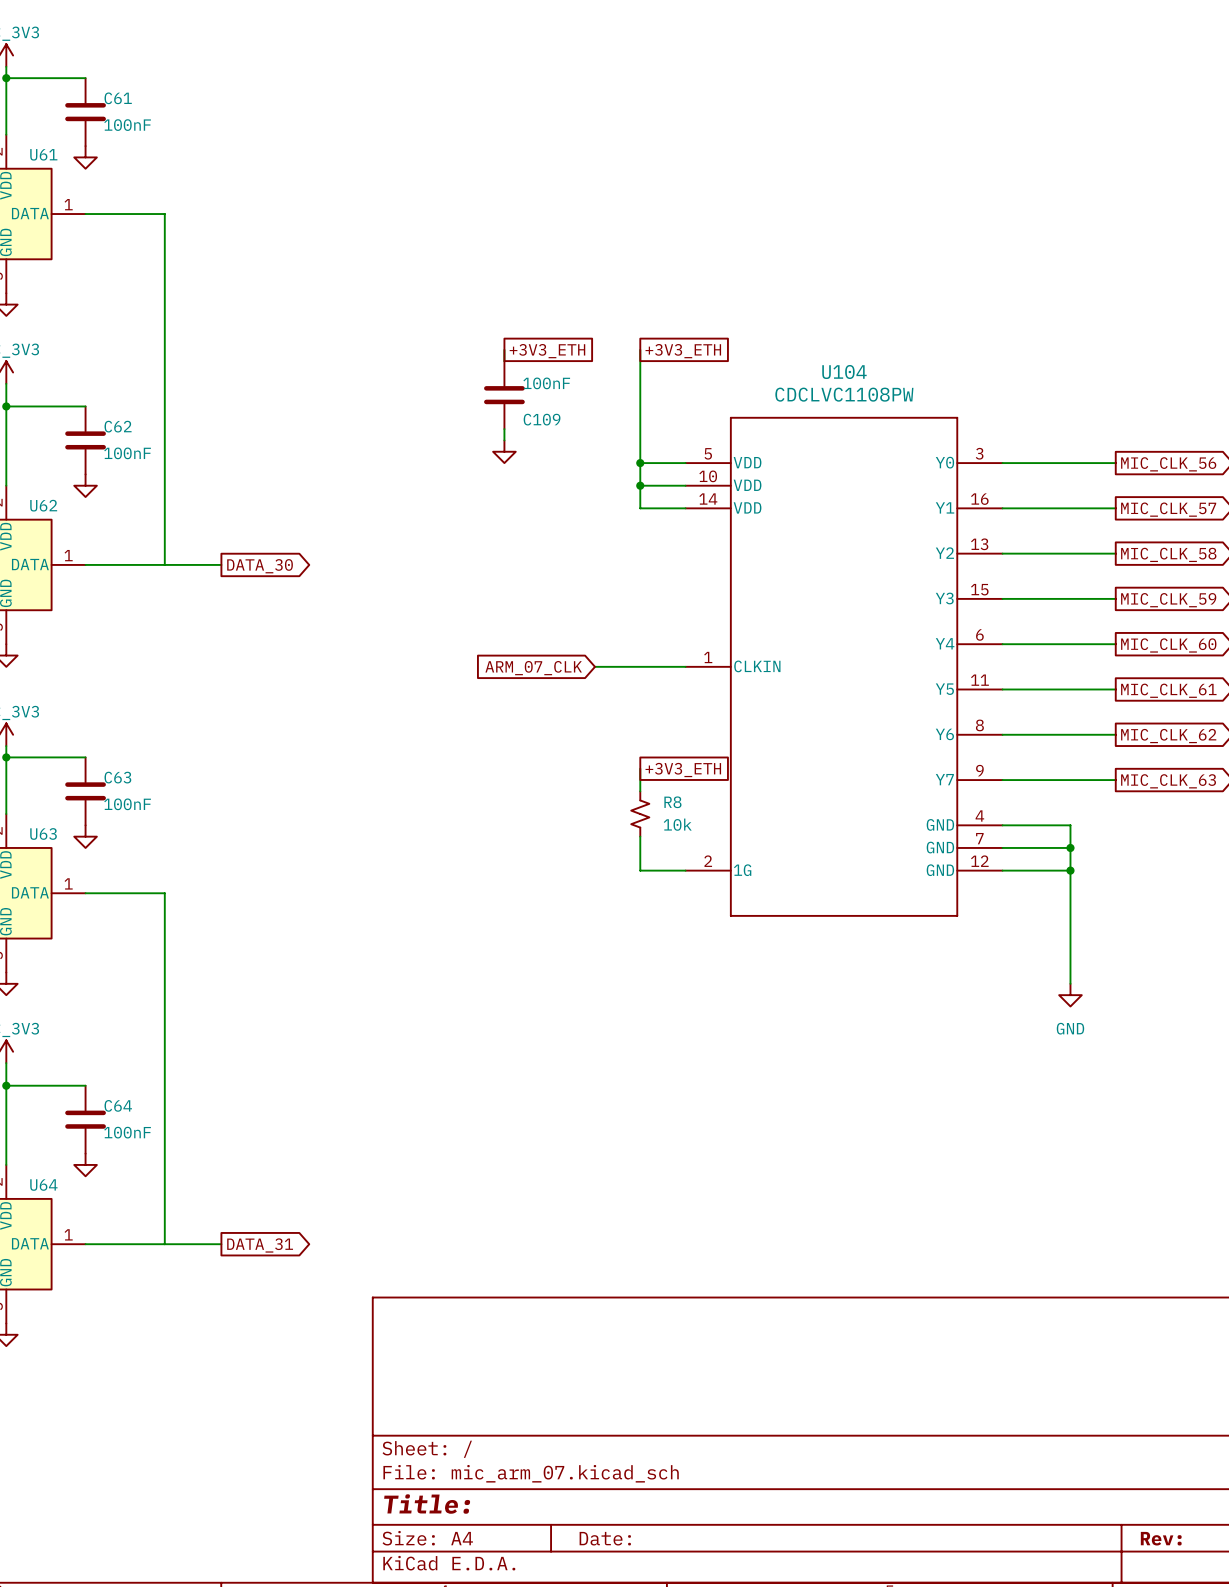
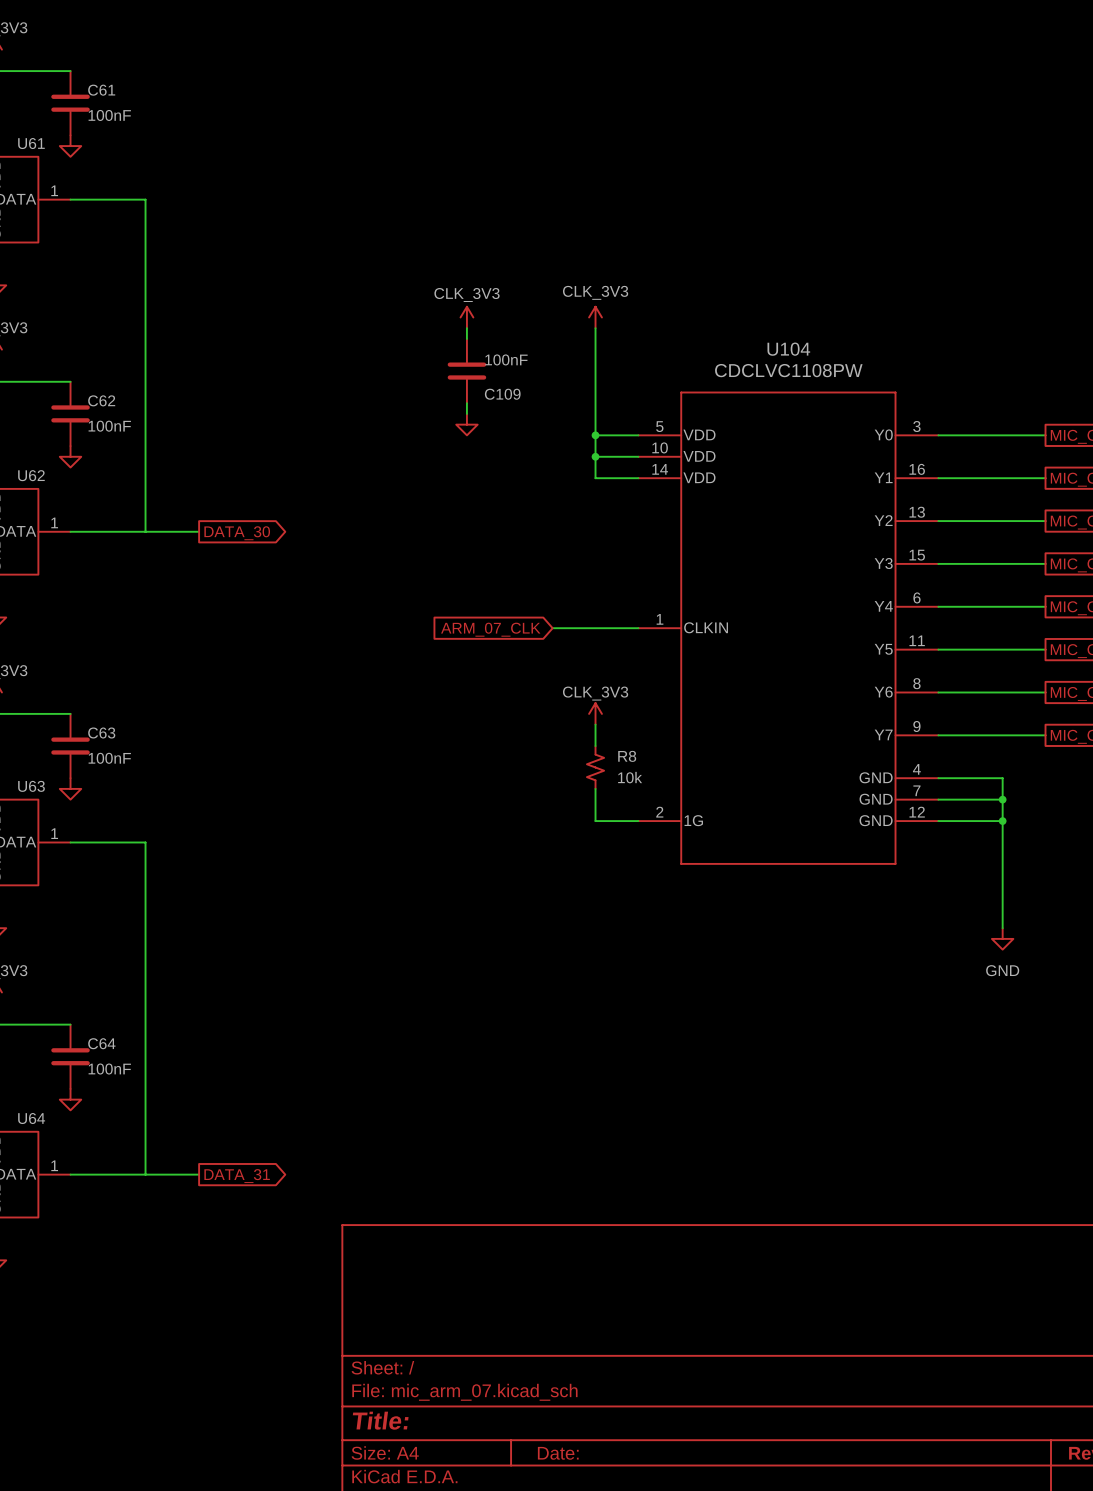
power symbol: none -> CLK_3V3 (466, 317)
power symbol: none -> CLK_3V3 (595, 317)
global label: +3V3_ETH (547, 351) -> none
global label: +3V3_ETH (683, 351) -> none
power symbol: none -> CLK_3V3 (595, 713)
global label: +3V3_ETH (683, 770) -> none

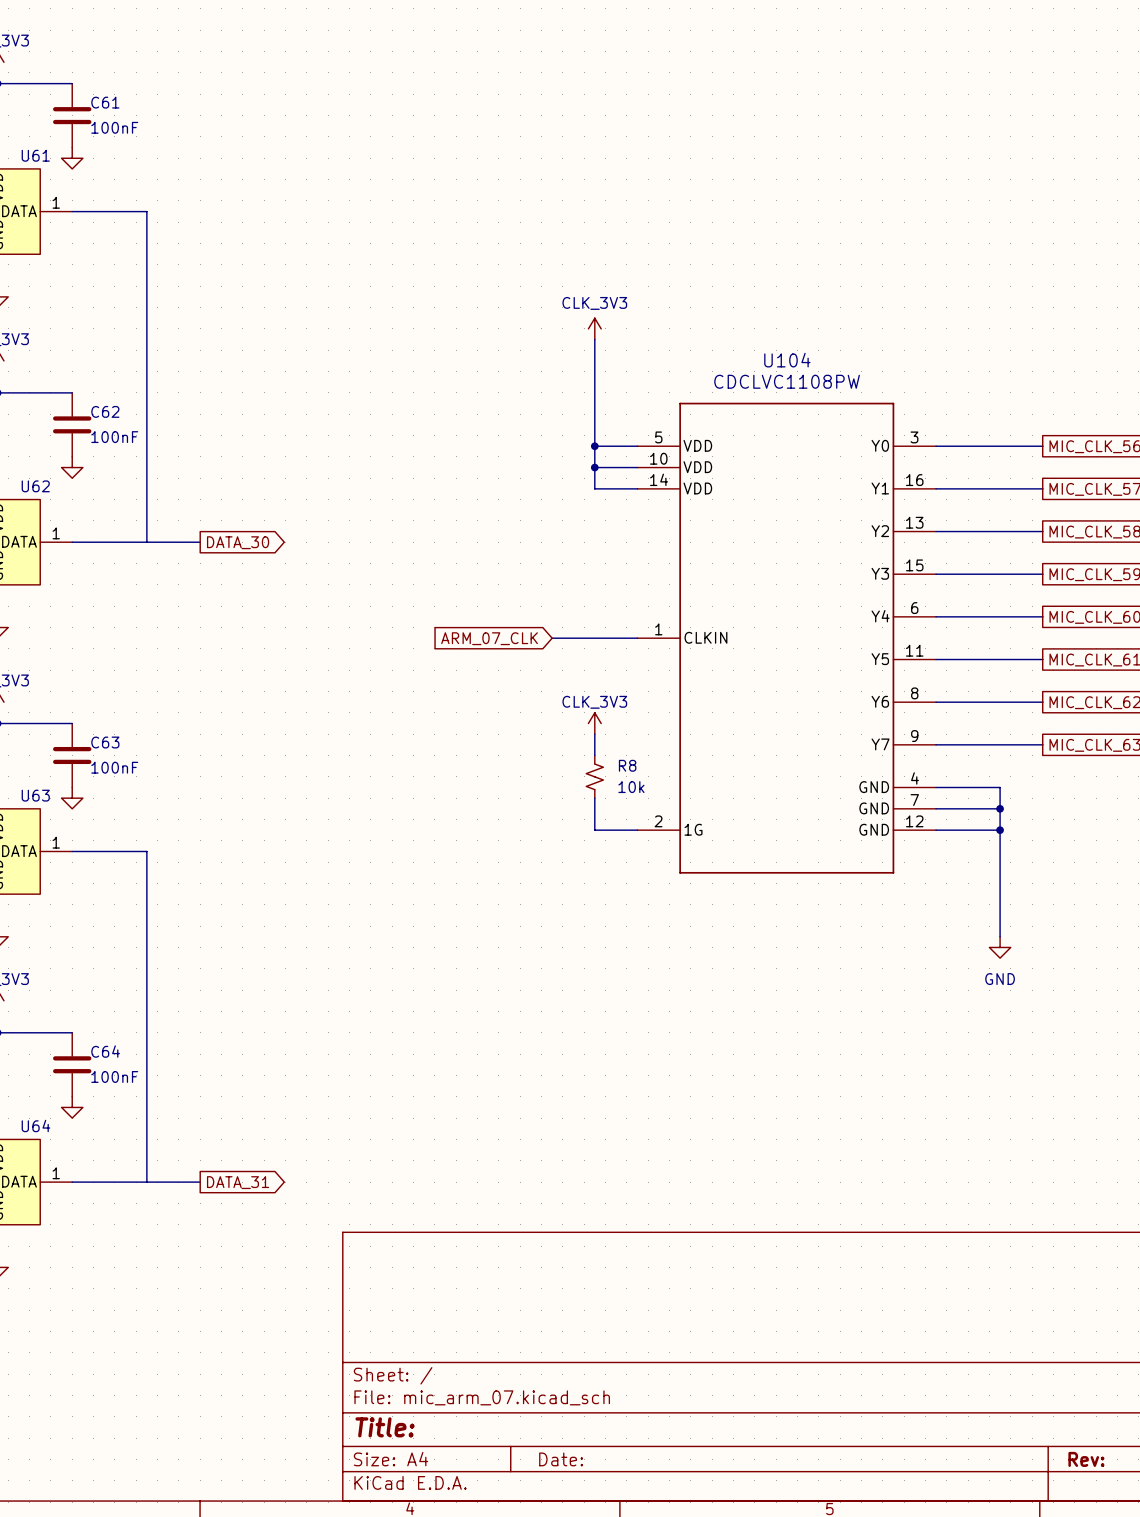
power symbol: CLK_3V3 (466, 317) -> none
wire: (466, 328) (466, 338) -> none
C109: 100nF (466, 371) -> none
wire: (466, 403) (466, 413) -> none
power symbol: (466, 424) -> none

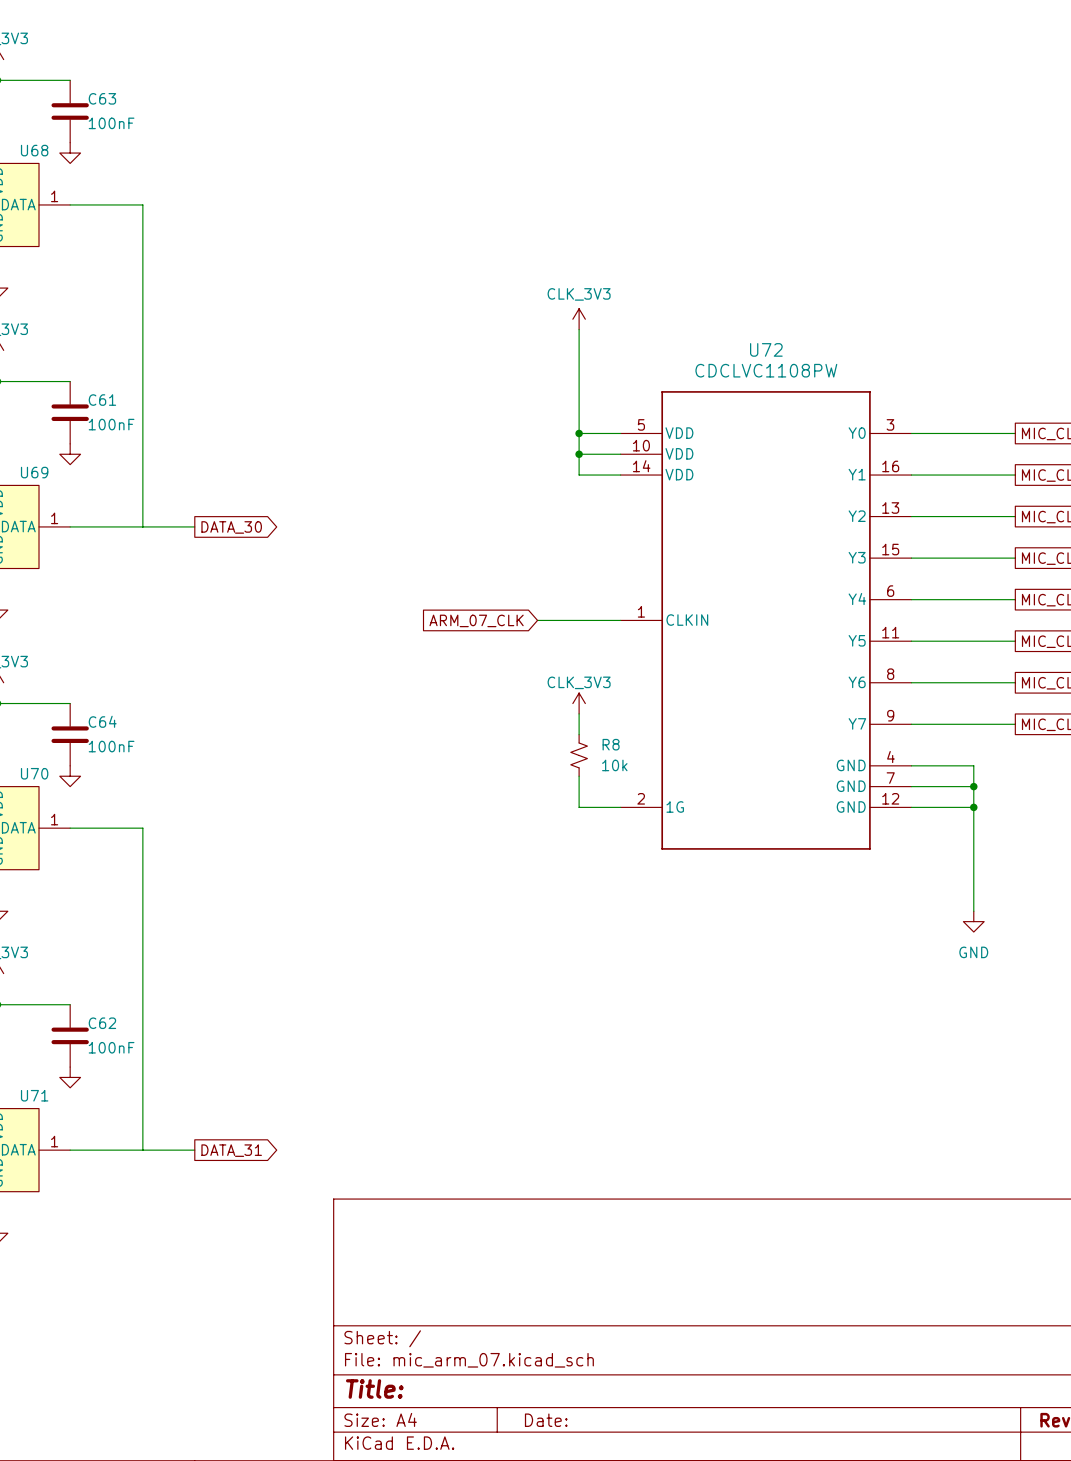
C61 name: C61 (105, 102) -> C63 (102, 98)
U61 name: U61 (35, 155) -> U68 (34, 150)
U104 name: U104 (787, 360) -> U72 (766, 349)
C62 name: C62 (105, 411) -> C61 (102, 400)
U62 name: U62 (35, 486) -> U69 (34, 472)
C63 name: C63 (105, 742) -> C64 (102, 721)
U63 name: U63 (35, 795) -> U70 (34, 773)
C64 name: C64 (105, 1051) -> C62 (102, 1023)
U64 name: U64 (35, 1125) -> U71 (34, 1095)

